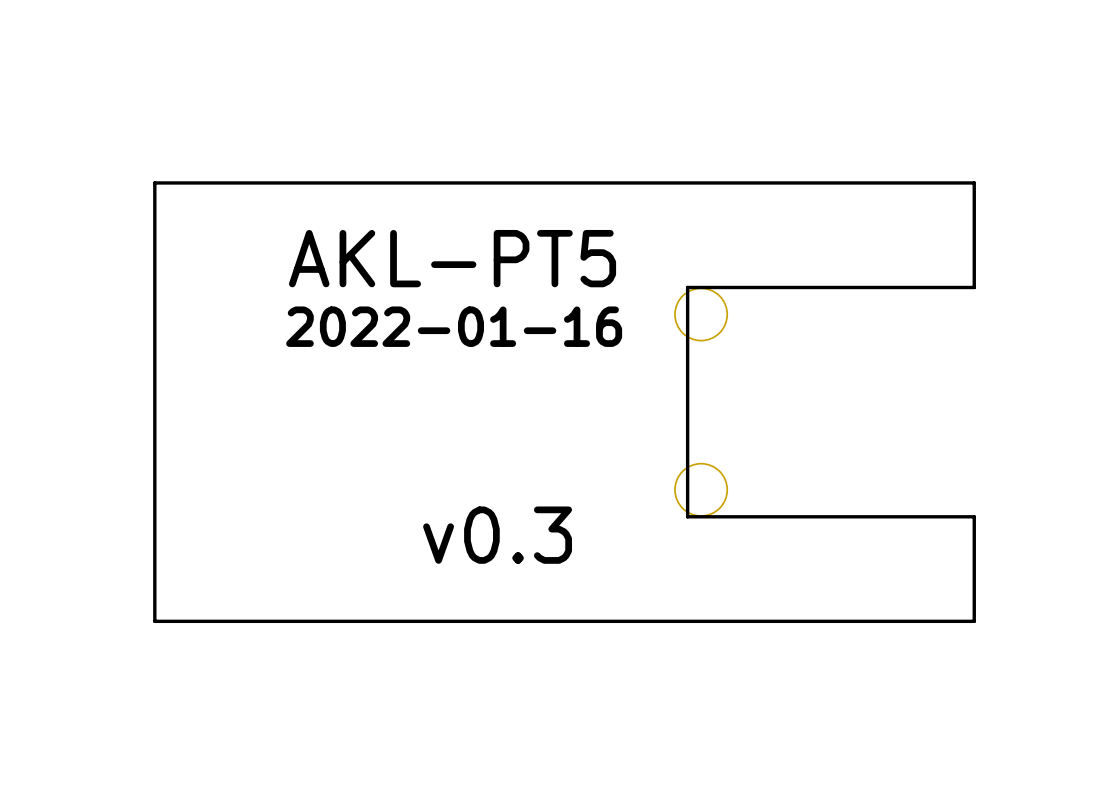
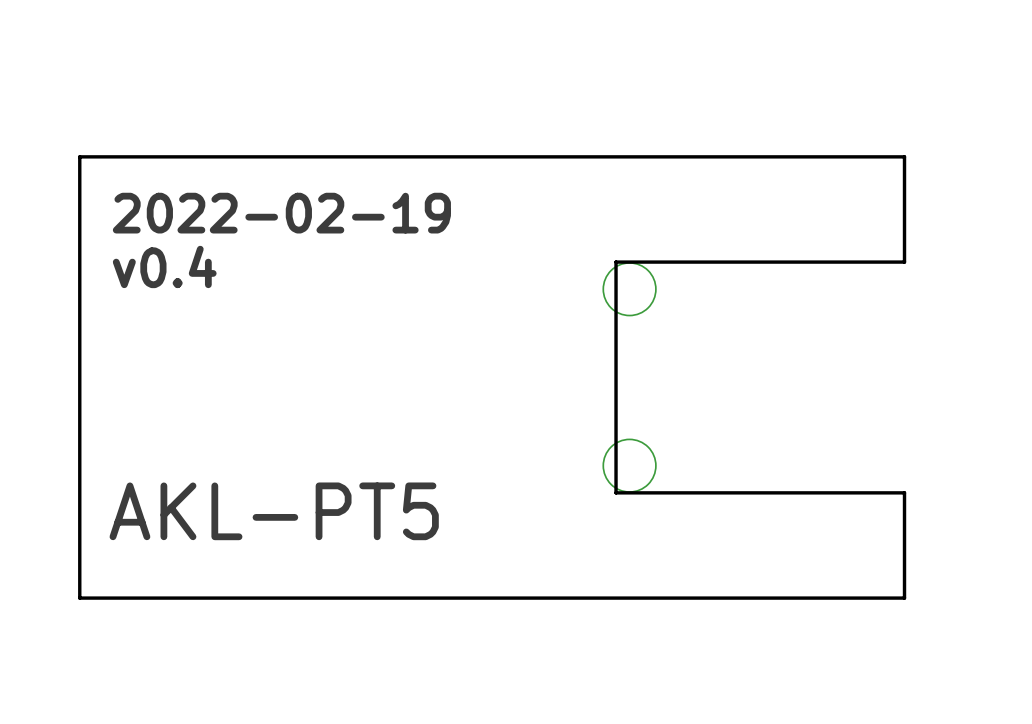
text: none -> 2022-02-19 (281, 213)
text position: AKL-PT5 (452, 258) -> AKL-PT5 (274, 511)
text: none -> v0.4 (164, 266)
text: 2022-01-16 (454, 326) -> none
text: v0.3 (497, 535) -> none

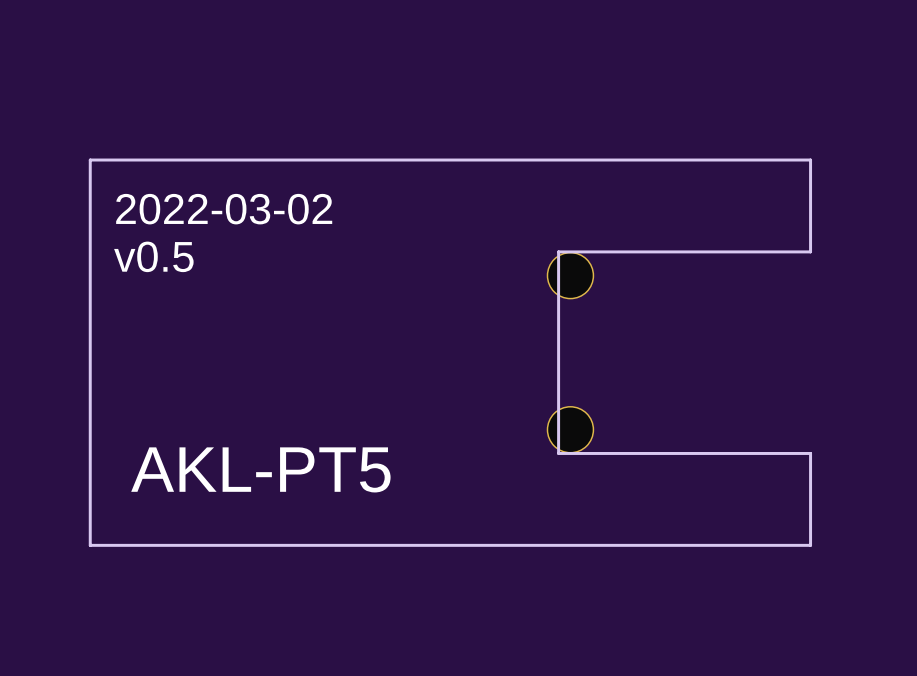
text: 2022-02-19 (281, 213) -> 2022-03-02 (224, 209)
text: v0.4 (164, 266) -> v0.5 (153, 256)

